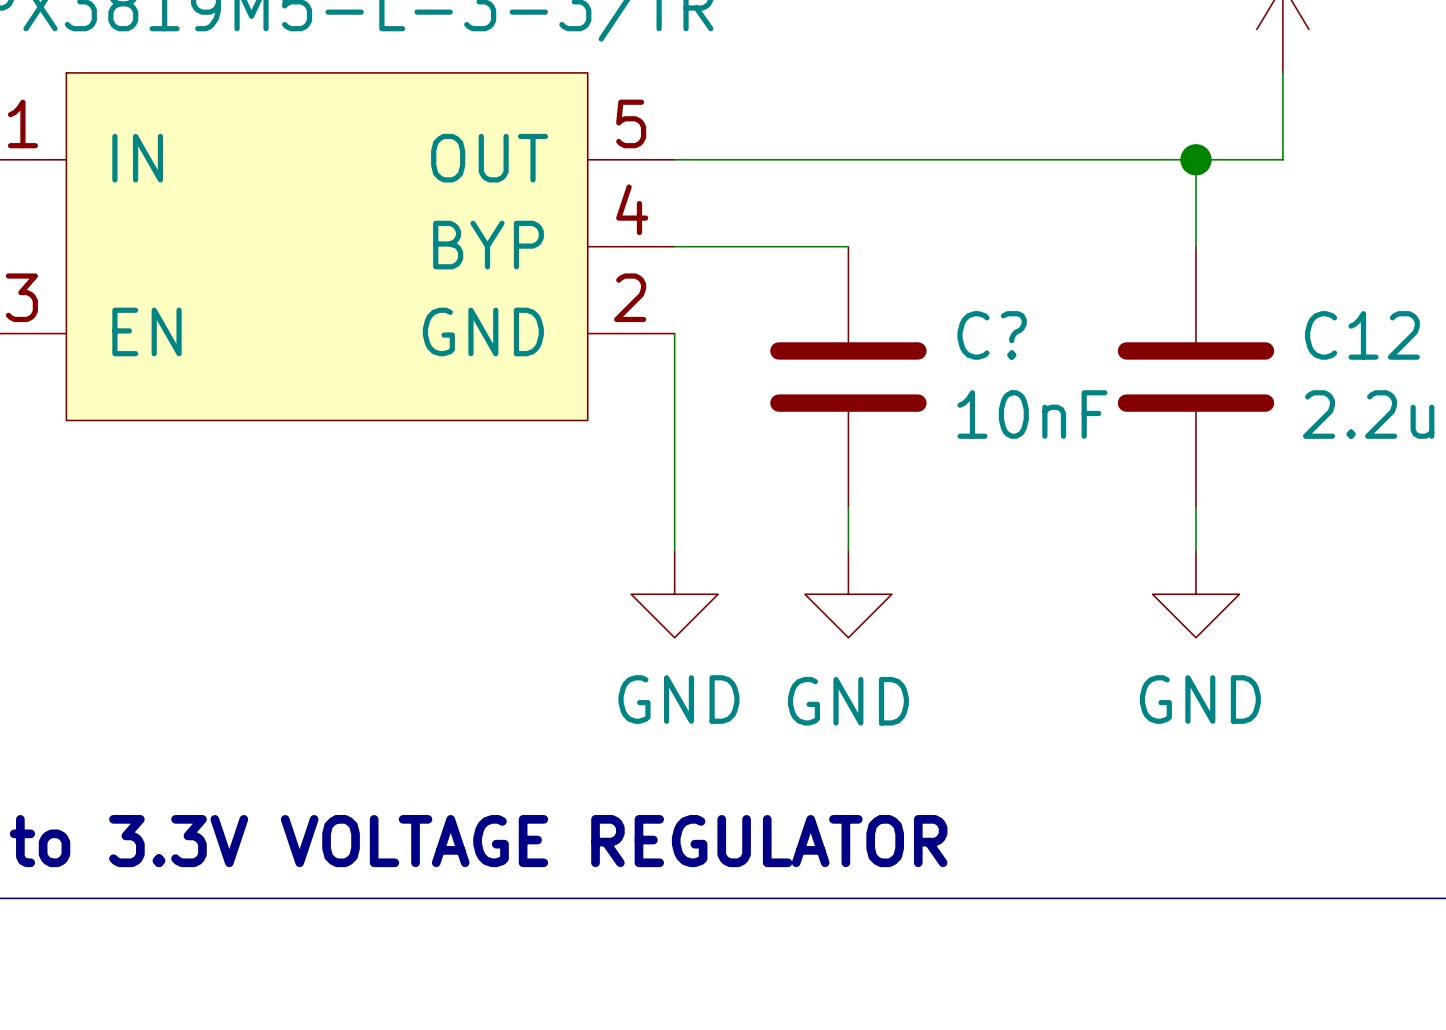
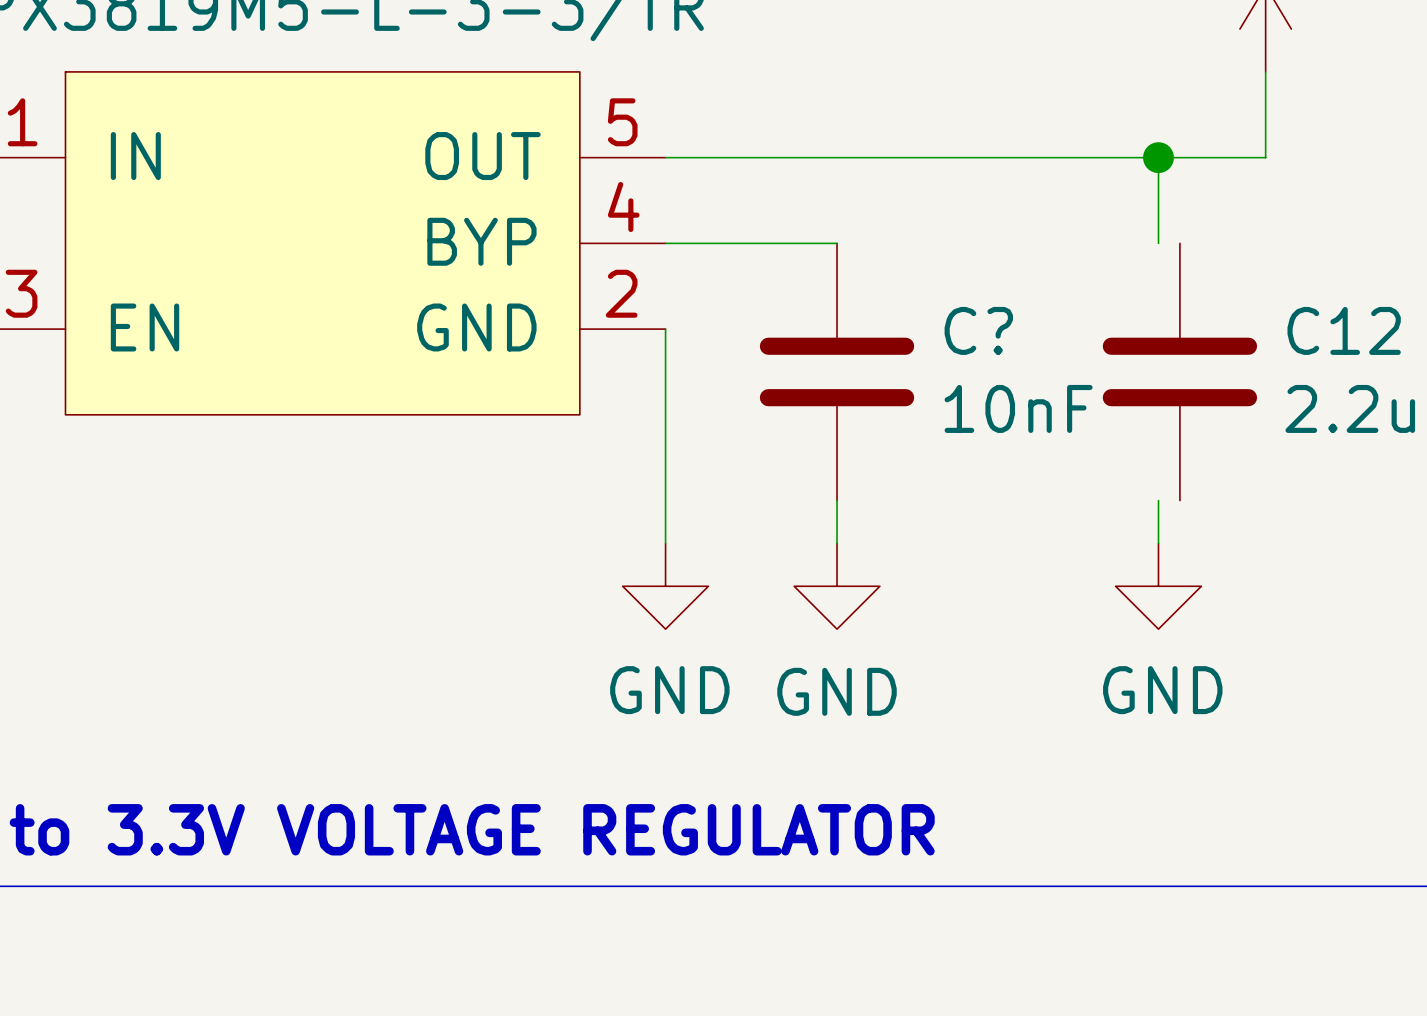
wire: (1196, 159) (1196, 246) -> (1158, 157) (1158, 243)
junction position: (1196, 159) -> (1158, 157)
wire: (1196, 507) (1196, 550) -> (1158, 500) (1158, 543)
power symbol position: GND (1196, 594) -> GND (1158, 586)

